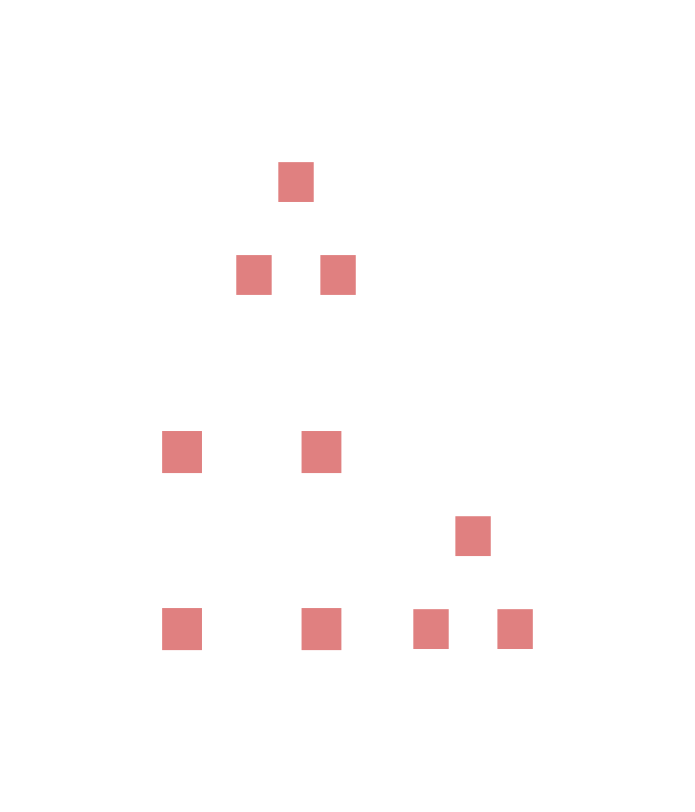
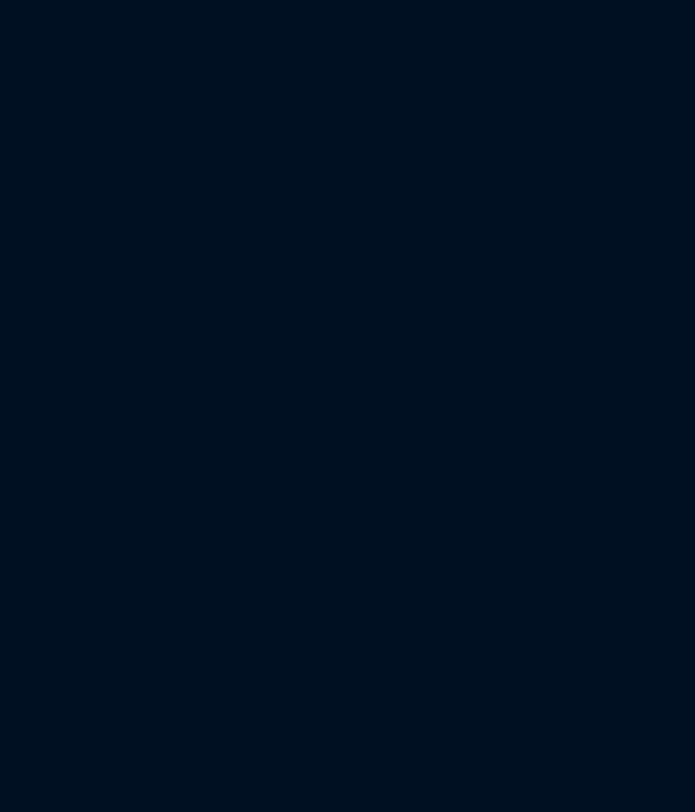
part: (296, 228) -> none
part: (251, 452) -> none
part: (473, 582) -> none
part: (251, 629) -> none

